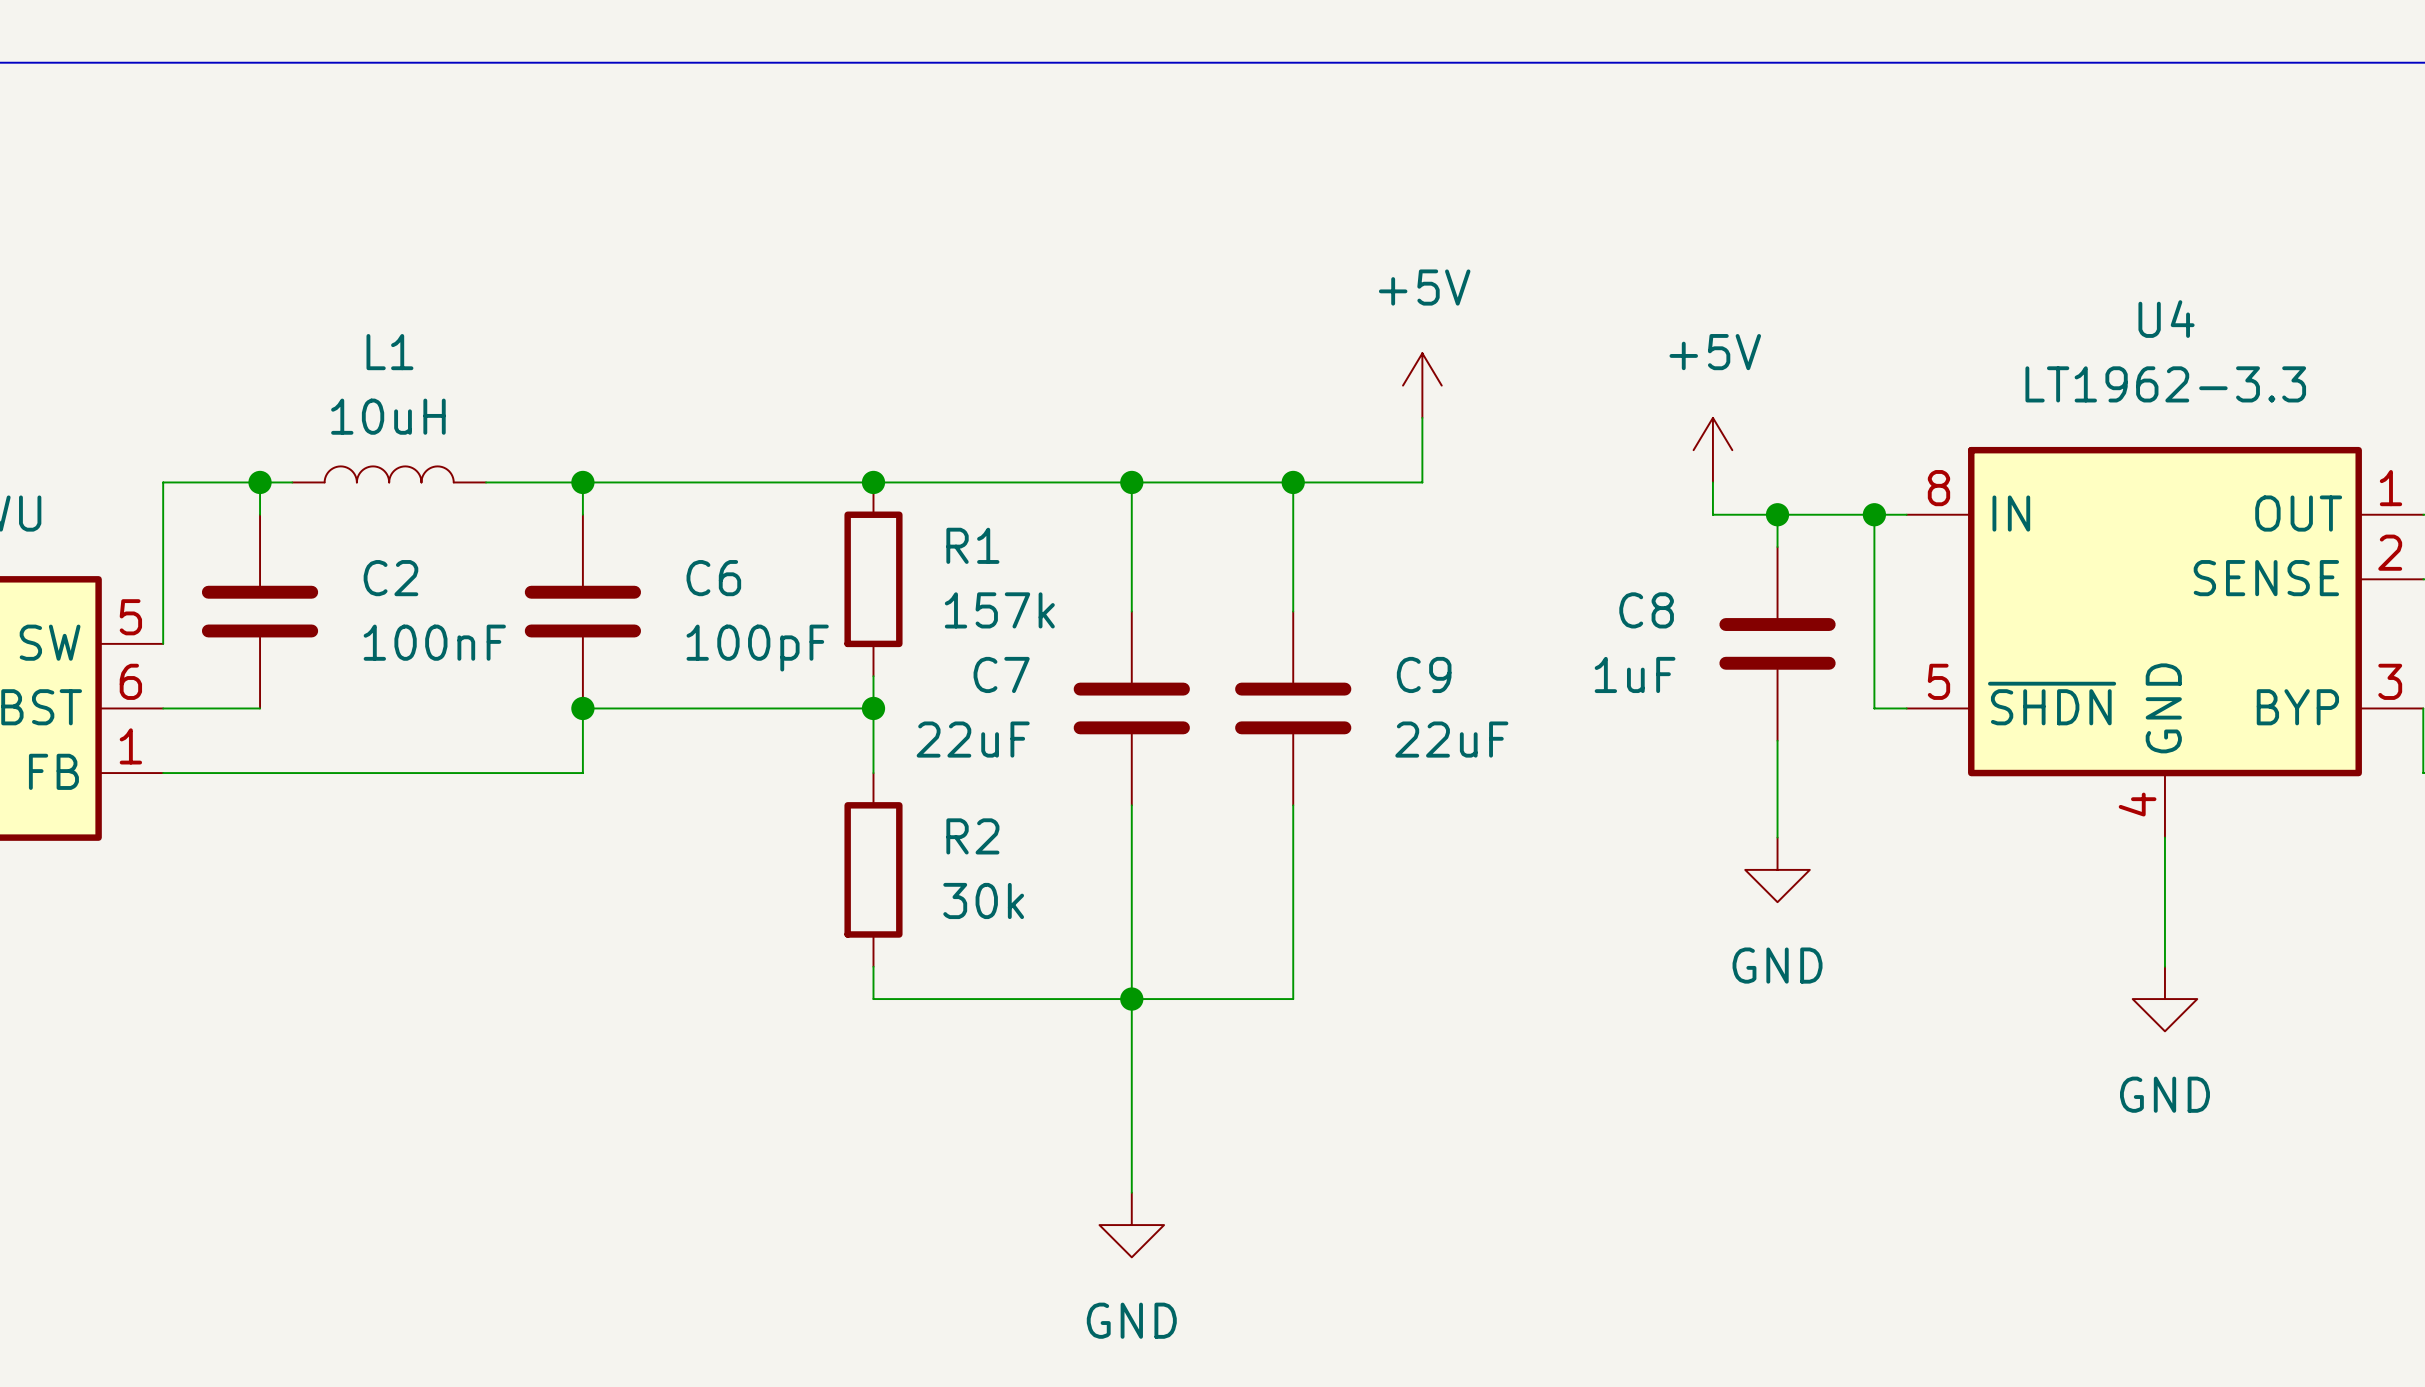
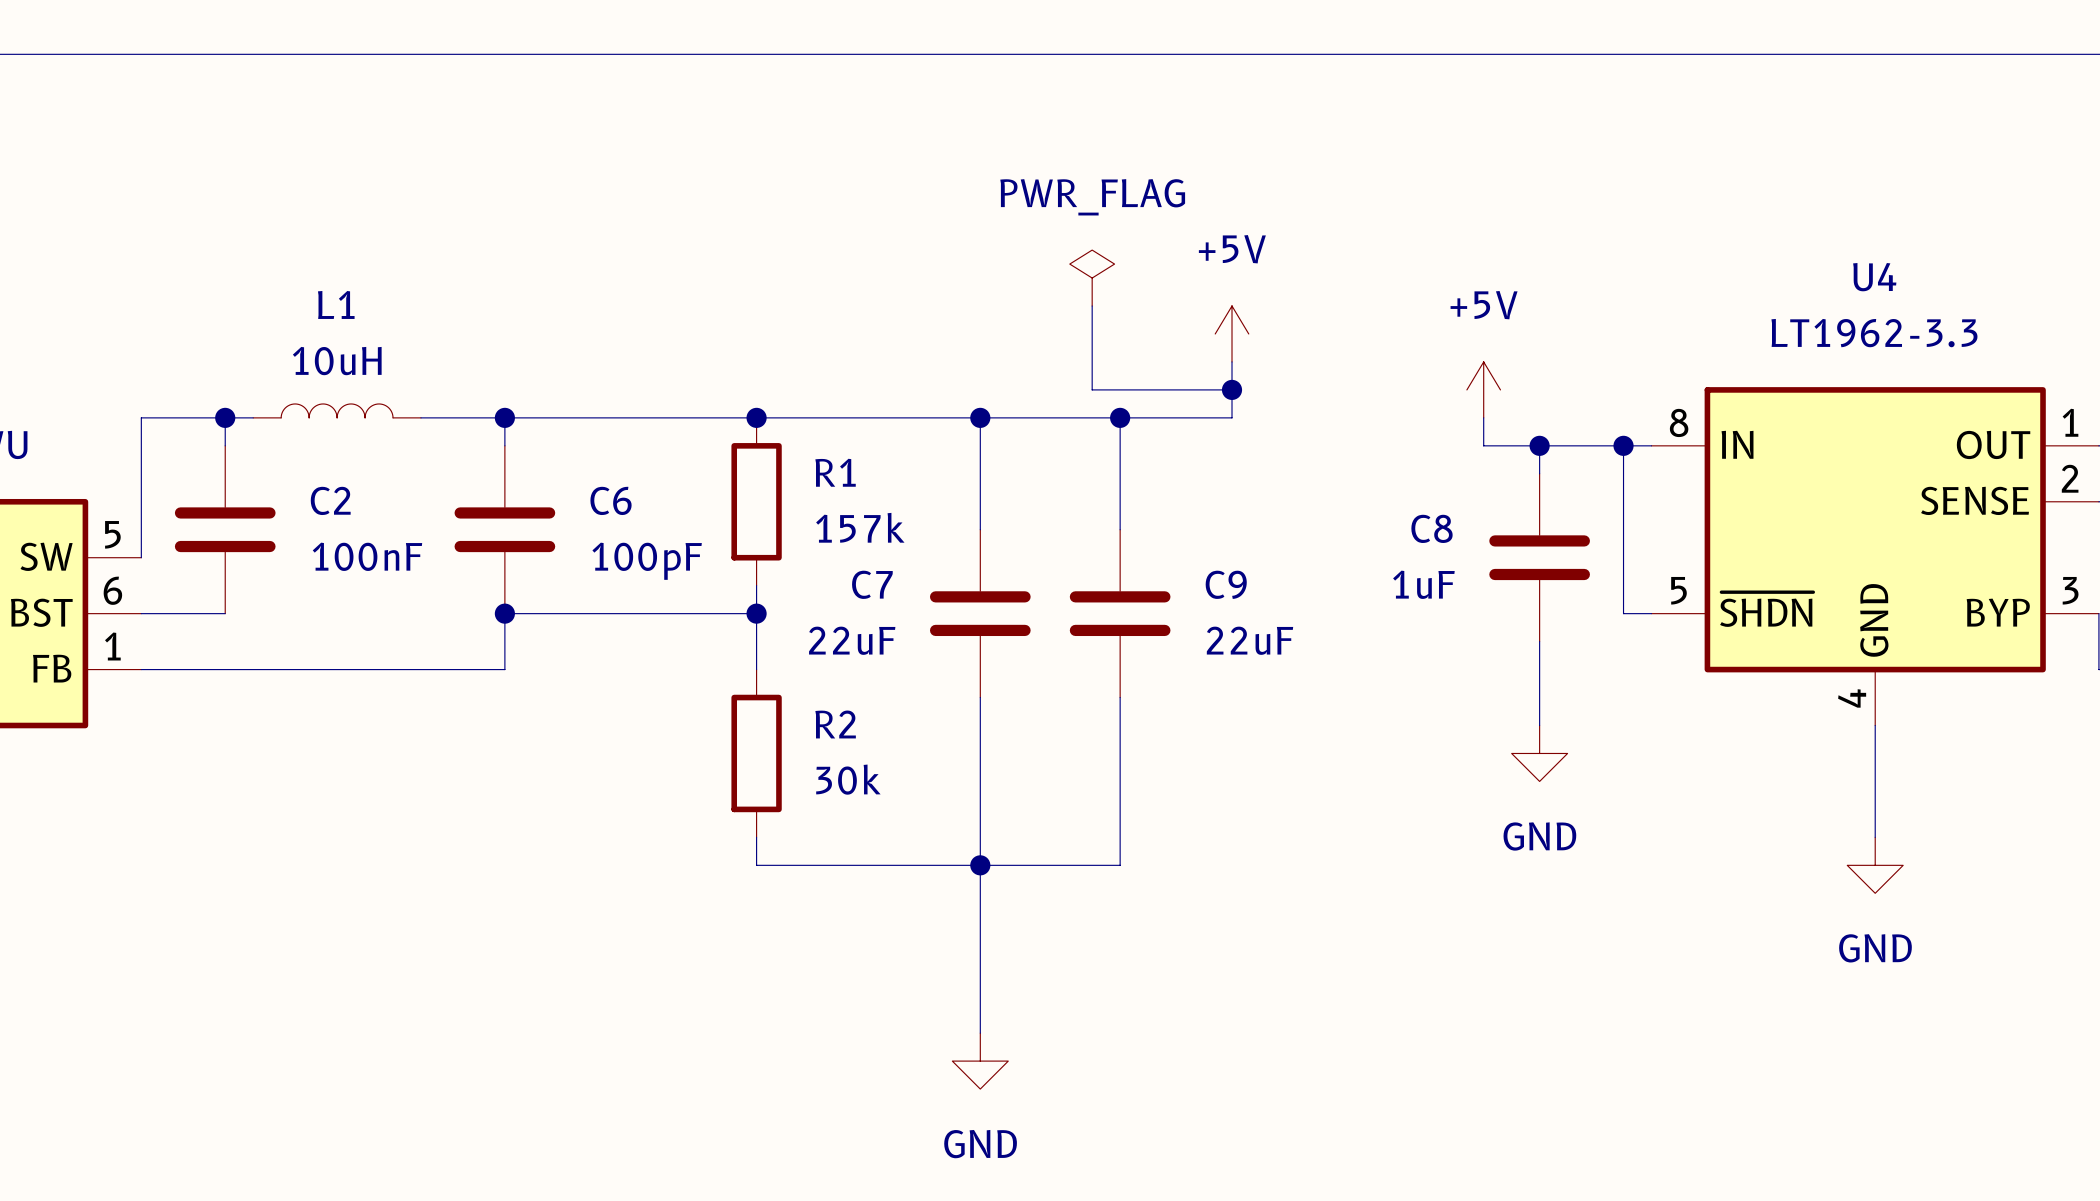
power symbol: none -> PWR_FLAG (1092, 278)
wire: none -> (1092, 306) (1092, 389) (1232, 389)
junction: none -> (1232, 389)

